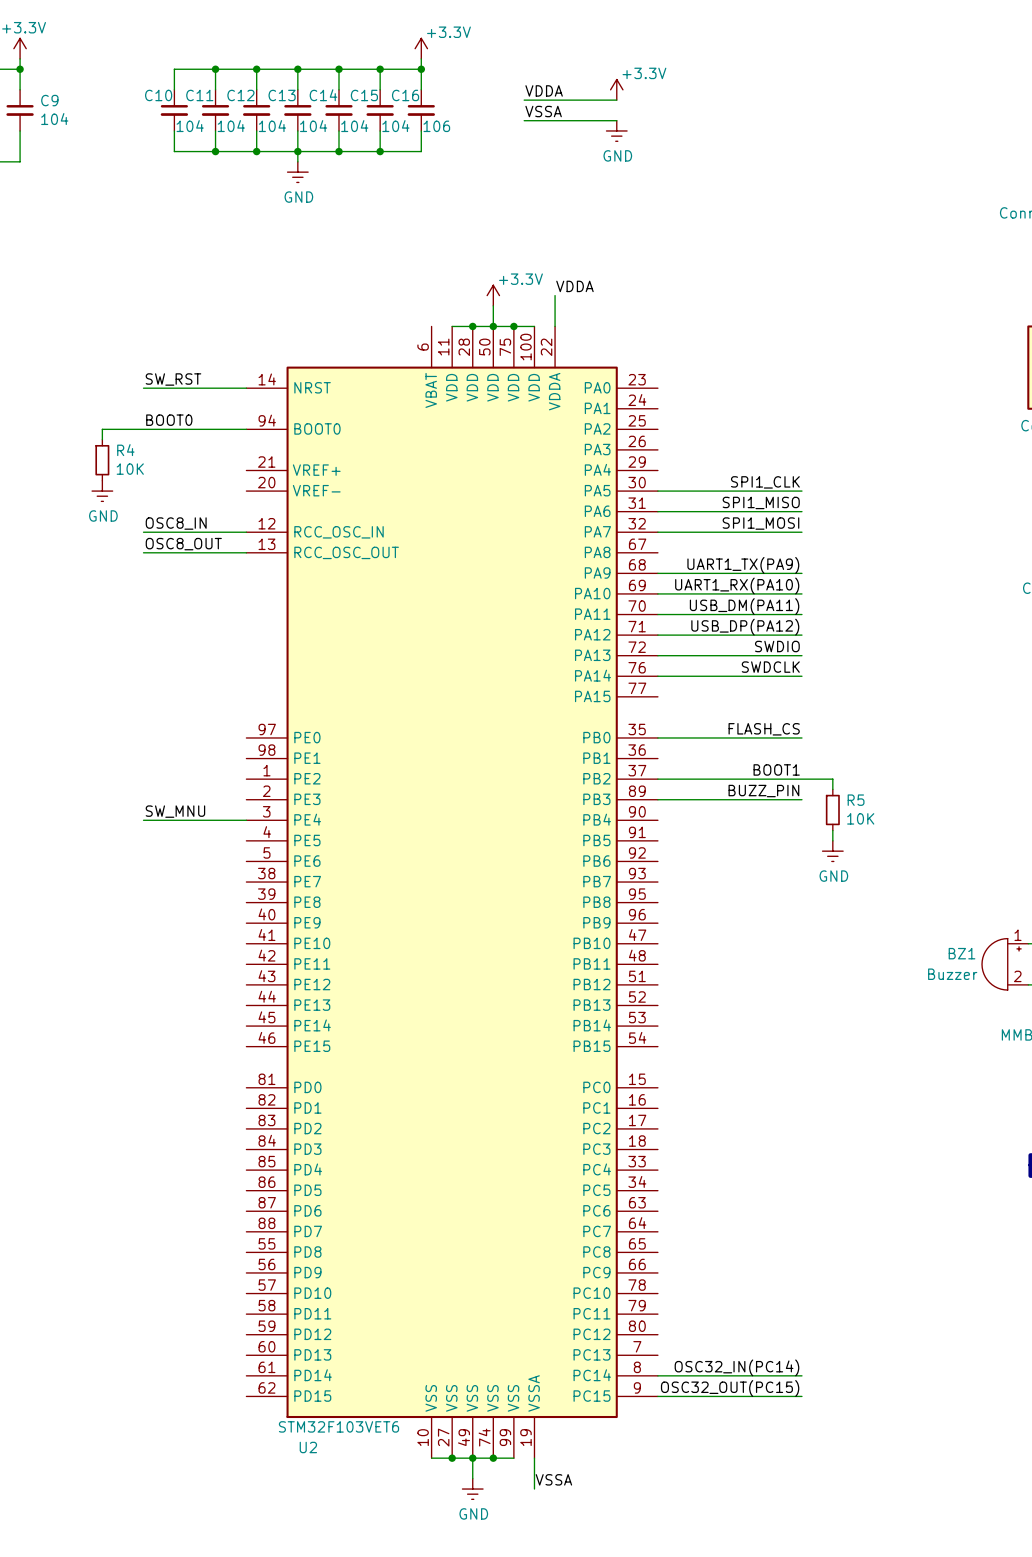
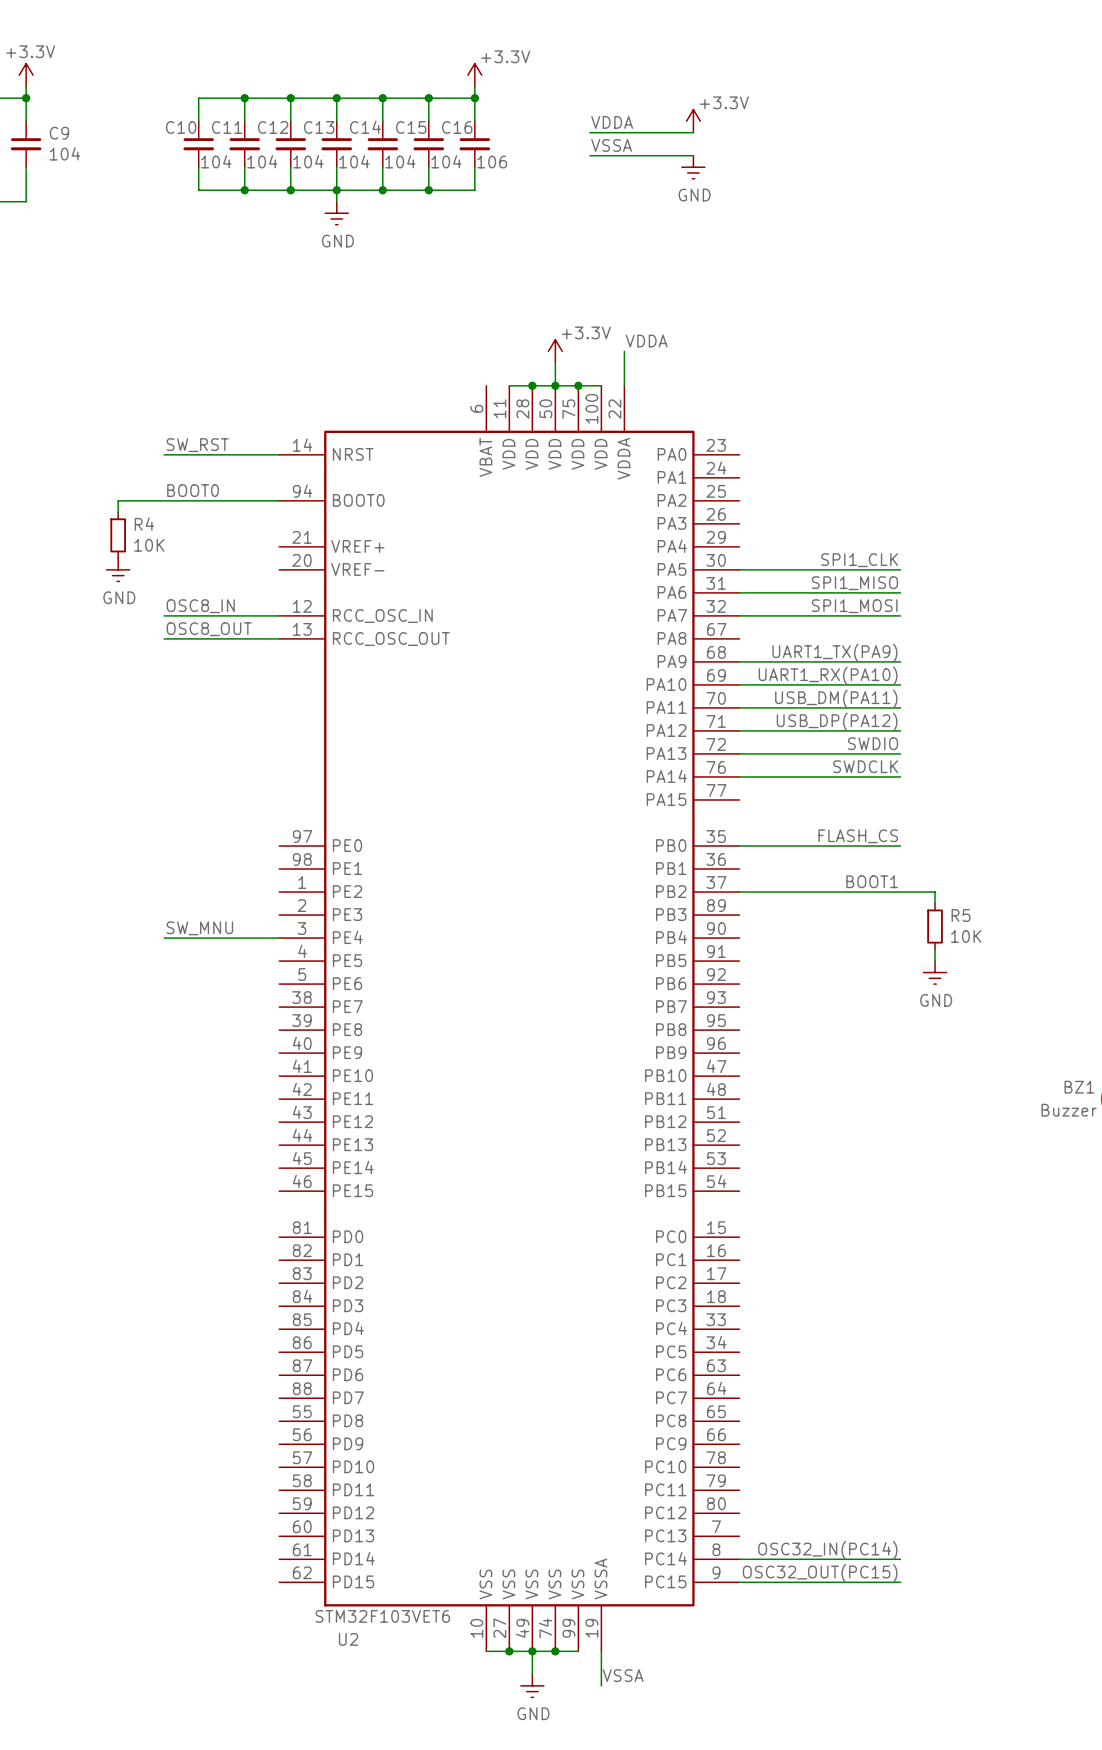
label: BUZZ_PIN (763, 791) -> none
wire: (657, 799) (801, 799) -> none

